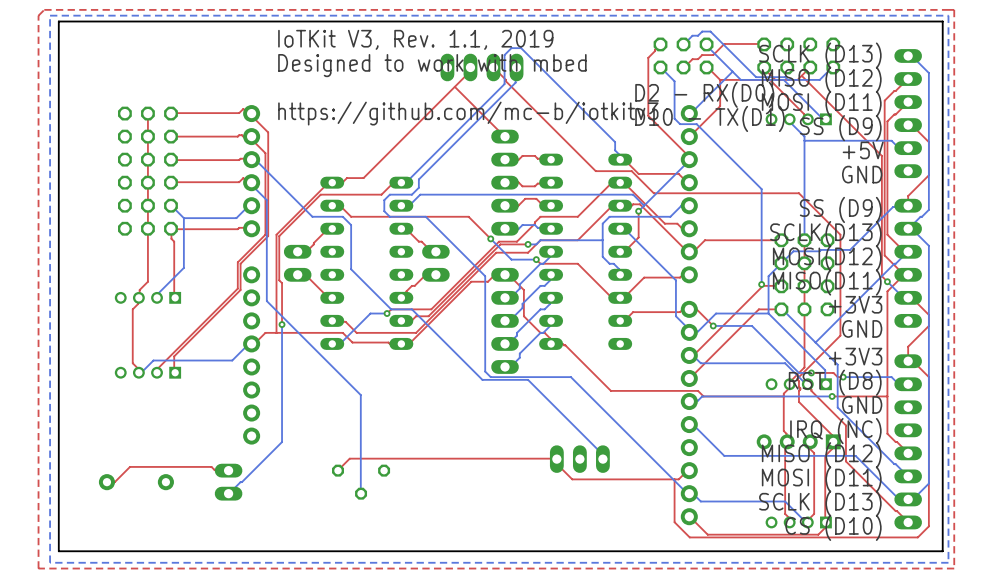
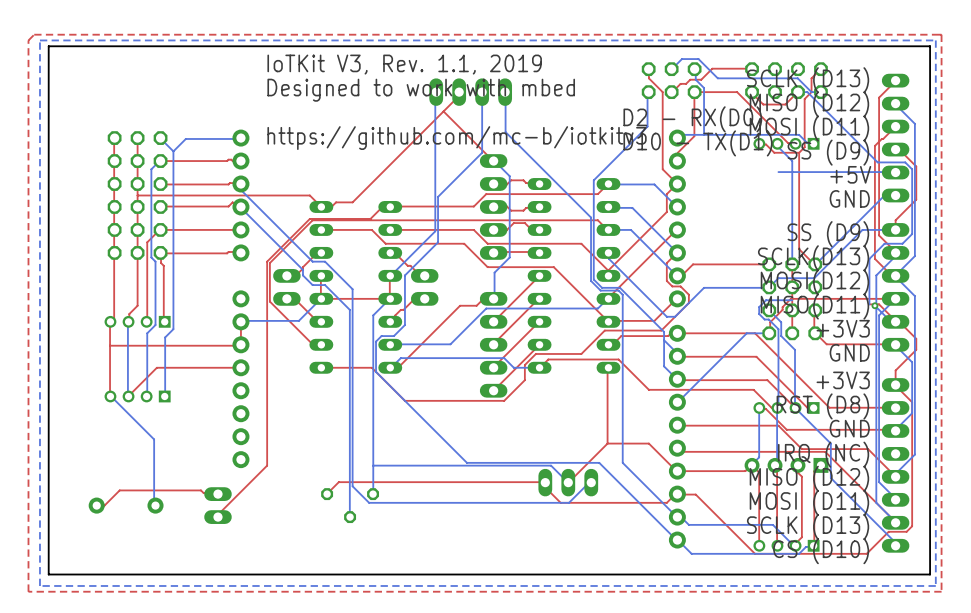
bottom track: (692, 35) (698, 35) (702, 31) (710, 31) (756, 77) (819, 79) (832, 67) -> (680, 60) (698, 59) (717, 78) (797, 78) (811, 92) (819, 92)
top track: (660, 44) (648, 57) (648, 115) (688, 155) (688, 158) -> (648, 69) (648, 78) (662, 92) (662, 169) (676, 183)
bottom track: (706, 44) (740, 79) (783, 79) (822, 118) -> (680, 134) (799, 134) (807, 143) (810, 143)
bottom track: none -> (694, 69) (695, 79) (704, 87) (704, 134)
top track: none -> (820, 69) (811, 78) (811, 92) (804, 99) (804, 147) (799, 152)
top track: none -> (895, 80) (879, 97) (879, 235) (895, 252)
bottom track: (908, 55) (912, 56) (928, 73) (928, 209) (921, 216) (920, 216) (913, 223) (912, 223) (908, 227) (908, 228) (909, 226) (928, 245) (928, 483) (913, 498) (898, 498) (855, 455) (724, 455) (693, 425) (689, 424) -> none
bottom track: none -> (436, 92) (435, 231) (390, 275)
top track: (493, 67) (595, 171) (631, 171) (653, 193) (798, 193) (840, 234) (840, 335) (797, 378) (800, 388) (798, 401) (832, 435) (833, 441) -> none
bottom track: none -> (482, 92) (482, 152) (438, 196) (438, 242) (404, 275) (404, 325) (393, 336) (381, 336) (376, 341) (376, 371) (466, 462) (599, 462) (691, 553) (799, 553) (806, 546) (813, 545)
bottom track: (516, 67) (515, 82) (418, 179) (418, 187) (411, 194) (389, 194) (384, 200) (384, 211) (389, 216) (425, 216) (485, 276) (485, 371) (490, 377) (570, 377) (689, 493) -> (597, 287) (600, 290) (618, 290) (622, 294) (622, 462) (677, 517)
bottom track: (660, 67) (674, 81) (674, 118) (680, 124) (696, 124) (761, 189) (761, 284) -> (648, 92) (647, 126) (593, 180) (593, 279) (602, 287) (619, 287) (664, 331)
top track: (707, 67) (720, 79) -> none
bottom track: none -> (797, 92) (807, 92) (877, 162) (905, 162) (912, 169) (912, 234) (902, 243) (884, 243) (869, 258) (869, 304)
bottom track: (732, 71) (692, 110) -> none
top track: (801, 75) (881, 155) (881, 276) (887, 281) -> none
top track: (720, 79) (769, 79) (807, 118) -> (695, 92) (737, 92) (788, 143) (795, 143)
top track: (720, 79) (720, 106) (689, 136) -> (694, 92) (694, 136) (677, 152) (677, 161)
top track: (908, 79) (884, 100) (884, 255) (904, 274) (887, 291) (887, 433) (897, 442) -> (677, 425) (778, 425) (801, 449) (868, 449) (884, 465)
bottom track: none -> (895, 103) (914, 123) (914, 256) (895, 275)
top track: none -> (114, 138) (114, 318) (110, 322) (110, 396)
top track: (170, 113) (239, 113) (243, 108) (247, 113) (251, 113) (251, 115) (268, 132) (268, 236) (240, 263) (240, 290) (174, 356) (175, 372) -> none
bottom track: none -> (160, 138) (173, 151)
bottom track: none -> (240, 138) (185, 138) (173, 151)
top track: none -> (759, 143) (766, 144) (774, 152) (799, 152)
bottom track: none -> (173, 151) (173, 242)
top track: none -> (799, 152) (799, 249) (815, 264)
bottom track: none -> (160, 161) (151, 169) (151, 257) (155, 261) (155, 325) (147, 333) (146, 396)
top track: (251, 136) (251, 139) (265, 153) (265, 234) (237, 262) (237, 288) (157, 368) (157, 372) -> none
bottom track: none -> (493, 161) (509, 176) (509, 257) (494, 272) (493, 298)
bottom track: (804, 140) (891, 140) (898, 147) -> (778, 172) (885, 172)
top track: (620, 159) (624, 160) (638, 173) (678, 173) (689, 182) -> (608, 184) (597, 194) (486, 194) (473, 206) (390, 206)
bottom track: (620, 159) (619, 154) (615, 150) (615, 142) (521, 48) (511, 48) (504, 55) (504, 84) (406, 182) (401, 182) -> (608, 184) (654, 184) (677, 206)
bottom track: (689, 159) (638, 211) -> none
bottom track: (251, 160) (255, 160) (312, 216) (342, 216) (351, 225) (351, 269) (391, 309) (411, 309) (482, 379) (528, 379) (602, 454) (602, 459) -> (240, 184) (240, 189) (312, 261) (325, 261) (352, 289) (352, 486) (369, 502) (568, 502) (591, 482)
bottom track: none -> (895, 195) (884, 195) (815, 264)
top track: (332, 182) (327, 183) (276, 234) (276, 332) -> (321, 206) (309, 195) (137, 195)
bottom track: none -> (608, 206) (632, 207) (677, 252)
bottom track: (251, 183) (266, 200) (266, 301) (360, 395) -> (240, 207) (302, 269) (302, 275) (312, 285) (325, 285) (349, 309) (349, 418)
top track: none -> (240, 229) (159, 229) (147, 242) (146, 321)
bottom track: (251, 205) (248, 205) (236, 218) (183, 218) (170, 205) -> none
top track: (340, 205) (351, 216) (468, 216) (490, 238) -> (329, 229) (371, 229) (385, 243) (464, 243) (487, 267) (553, 267) (607, 320)
top track: none -> (390, 229) (473, 229) (487, 243) (581, 243) (608, 271) (608, 275)
top track: (619, 205) (612, 205) (577, 240) (540, 240) (528, 252) (496, 252) (416, 332) (356, 332) (345, 321) (332, 320) -> (607, 229) (597, 220) (312, 220) (269, 263) (269, 301) (312, 344) (321, 344)
top track: (620, 205) (640, 204) (689, 251) -> none
bottom track: none -> (608, 229) (631, 229) (677, 275)
bottom track: (644, 205) (633, 194) (420, 194) (409, 205) (401, 205) -> none
top track: none -> (677, 229) (608, 298)
bottom track: (689, 205) (681, 205) (670, 216) (609, 216) (602, 223) -> (505, 92) (505, 132) (591, 217) (591, 247)
bottom track: (895, 205) (850, 249) (793, 251) (790, 254) -> (883, 229) (862, 229) (814, 278) (778, 278)
top track: (638, 211) (638, 237) (624, 251) (620, 251) -> (677, 184) (666, 194) (666, 212) (608, 269) (608, 275)
via: (638, 211) -> none
top track: none -> (539, 252) (493, 252)
bottom track: (551, 228) (537, 227) (534, 225) (522, 225) (518, 229) (505, 228) -> none
top track: (689, 228) (681, 227) (677, 223) (664, 223) (624, 183) (610, 183) (577, 216) (540, 216) (517, 241) (499, 241) (431, 309) (391, 309) (387, 313) -> (677, 252) (666, 263) (666, 280) (672, 286) (680, 286) (688, 294) (688, 302) (661, 330) (604, 330) (581, 353) (535, 353) (524, 365) (524, 380) (504, 400) (404, 400) (371, 367) (321, 367)
bottom track: none -> (895, 252) (895, 256) (876, 275) (876, 502) (895, 522)
bottom track: (620, 229) (624, 229) (675, 280) (675, 307) -> (608, 253) (608, 258) (666, 316) (675, 316) (704, 287) (768, 287)
top track: (279, 236) (282, 324) -> (268, 260) (267, 465) (218, 513) (217, 517)
bottom track: (490, 238) (511, 259) (536, 259) -> none
via: (490, 238) -> none
bottom track: (602, 240) (540, 240) (536, 244) (528, 244) -> none
top track: (528, 244) (500, 244) (428, 316) (416, 316) (411, 320) (401, 320) -> none
via: (528, 244) -> none
top track: none -> (321, 275) (320, 298) (390, 298)
top track: none -> (390, 275) (389, 298)
top track: none -> (539, 275) (493, 321)
bottom track: (551, 251) (550, 256) (519, 284) (519, 288) (511, 296) (505, 297) -> none
bottom track: (908, 252) (894, 263) (815, 342) -> (895, 276) (914, 296) (914, 454) (895, 473) (895, 476)
top track: (536, 259) (540, 263) (577, 263) (610, 296) (619, 296) -> none
via: (536, 259) -> none
bottom track: (609, 263) (613, 263) (619, 269) (619, 274) -> (390, 344) (450, 344) (486, 308) (597, 308) (607, 298)
bottom track: (781, 263) (768, 276) (768, 313) -> none
bottom track: (183, 267) (157, 294) (157, 297) -> (173, 291) (173, 329) (165, 337) (164, 396)
bottom track: none -> (321, 298) (298, 320) (240, 321)
bottom track: none -> (390, 298) (373, 315) (373, 494)
top track: (505, 274) (508, 274) (523, 290) (523, 316) (540, 332) (544, 332) (550, 338) (551, 343) -> none
top track: none -> (539, 298) (493, 344)
bottom track: (551, 274) (550, 280) (544, 285) (540, 285) (522, 303) (522, 307) (510, 320) (505, 320) -> none
top track: (688, 274) (682, 274) (680, 277) (644, 277) (624, 296) -> (676, 298) (654, 320) (613, 320)
bottom track: none -> (792, 300) (766, 300) (759, 307) (759, 314) (764, 319) (768, 319) (778, 329) (777, 462) (775, 465)
top track: none -> (869, 304) (879, 304) (895, 321)
via: (761, 284) -> none
top track: (763, 285) (693, 354) (689, 355) -> (795, 407) (767, 380) (677, 379)
top track: (763, 285) (781, 286) -> none
top track: none -> (815, 310) (814, 333) (826, 344) (895, 344)
top track: (138, 297) (138, 303) (132, 309) (132, 363) (138, 368) (138, 372) -> (240, 367) (156, 367) (128, 396)
top track: none -> (240, 321) (240, 345) (110, 345)
top track: none -> (539, 321) (493, 367)
bottom track: (551, 297) (550, 303) (544, 309) (540, 309) (508, 343) (505, 343) -> none
top track: (696, 309) (713, 325) -> (684, 333) (746, 333)
top track: (758, 309) (689, 378) -> none
top track: none -> (755, 333) (829, 407) (895, 407)
top track: (781, 309) (767, 309) -> (769, 333) (770, 322) (790, 298) (891, 298)
bottom track: (781, 309) (837, 364) (837, 407) (894, 464) (904, 471) -> (895, 298) (879, 315) (879, 482) (891, 494)
bottom track: none -> (769, 333) (746, 333) (677, 402)
top track: (804, 309) (804, 367) (790, 381) (789, 388) (783, 393) (783, 431) (786, 433) (787, 441) (785, 443) (785, 513) (789, 518) -> (775, 465) (777, 467) (777, 541)
bottom track: (387, 313) (370, 313) (340, 343) (332, 343) -> none
via: (387, 313) -> none
bottom track: (768, 313) (716, 313) (698, 331) (689, 332) -> none
bottom track: (768, 313) (825, 370) (825, 384) -> none
bottom track: none -> (664, 340) (664, 366) (677, 379)
top track: none -> (539, 344) (493, 390)
bottom track: (551, 320) (550, 325) (519, 353) (519, 357) (511, 366) (505, 366) -> none
bottom track: none -> (895, 344) (912, 362) (912, 413) (895, 430)
bottom track: (282, 324) (282, 442) (228, 493) -> none
via: (282, 324) -> none
bottom track: (713, 325) (751, 325) (798, 372) (811, 372) -> none
via: (713, 325) -> none
top track: none -> (677, 356) (756, 356) (807, 407) (813, 407)
bottom track: (251, 343) (248, 343) (232, 360) (153, 360) (138, 372) -> (128, 321) (128, 396)
top track: (401, 343) (352, 342) (342, 332) (265, 332) (254, 343) (251, 343) -> none
top track: (551, 343) (565, 345) (610, 390) (698, 390) (703, 396) (783, 396) -> (540, 367) (548, 359) (618, 359) (648, 389) (753, 389) (771, 407) (777, 407)
bottom track: none -> (539, 367) (513, 367) (504, 358) (400, 358) (390, 367)
top track: none -> (608, 367) (607, 443)
bottom track: (689, 355) (693, 356) (700, 363) (785, 363) (807, 384) -> (769, 310) (781, 322) (781, 336) (795, 349) (795, 407)
top track: (908, 361) (913, 361) (928, 377) (928, 526) (917, 537) (689, 537) (674, 522) (674, 479) -> (895, 385) (912, 402) (912, 526) (906, 531) (888, 531) (866, 553) (755, 553) (695, 494) (677, 494)
bottom track: none -> (110, 396) (154, 439) (155, 505)
top track: (811, 372) (833, 372) (837, 377) (843, 377) -> none
via: (811, 372) -> none
bottom track: (843, 377) (891, 377) (898, 384) (908, 384) -> none
via: (843, 377) -> none
top track: none -> (759, 407) (766, 409) (786, 429) (895, 430)
bottom track: none -> (759, 407) (759, 457) (752, 465)
top track: (807, 384) (811, 390) (845, 425) (845, 461) (908, 522) -> none
bottom track: none -> (795, 407) (830, 443) (830, 478) (895, 542) (895, 545)
bottom track: (832, 396) (702, 396) (698, 400) (689, 401) -> none
via: (832, 396) -> none
top track: (887, 396) (832, 396) -> none
top track: none -> (607, 443) (648, 443) (676, 471) (745, 471) (752, 465) (759, 472) (759, 545)
top track: none -> (607, 443) (568, 482)
top track: none -> (677, 448) (680, 451) (825, 451) (895, 522)
bottom track: none -> (373, 465) (551, 465) (568, 482)
top track: (832, 442) (832, 448) (825, 455) (825, 527) (818, 534) (707, 534) (689, 516) -> (819, 465) (814, 471) (813, 545)

